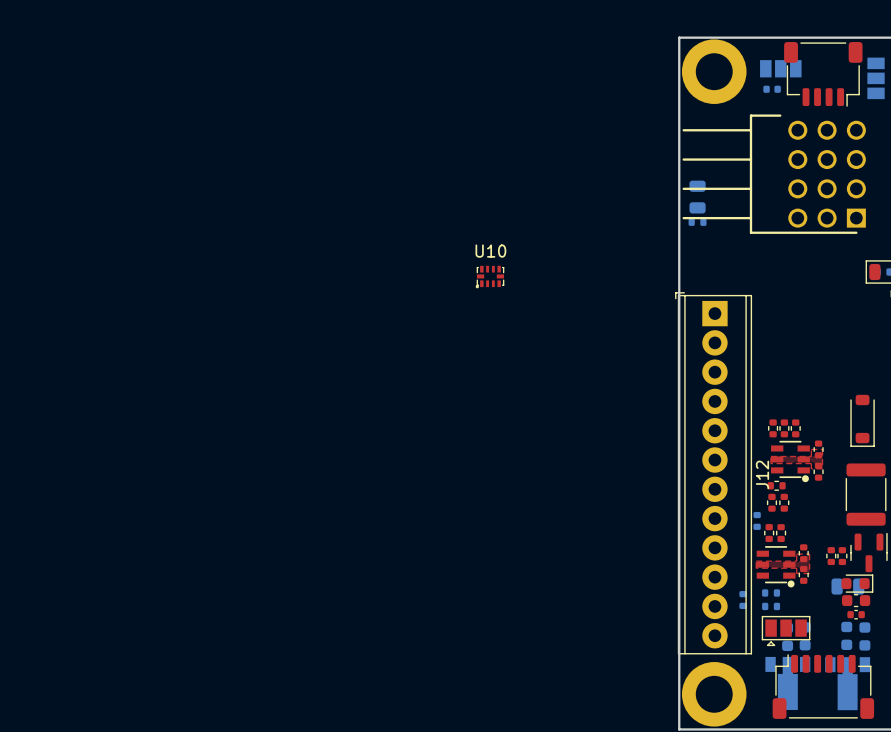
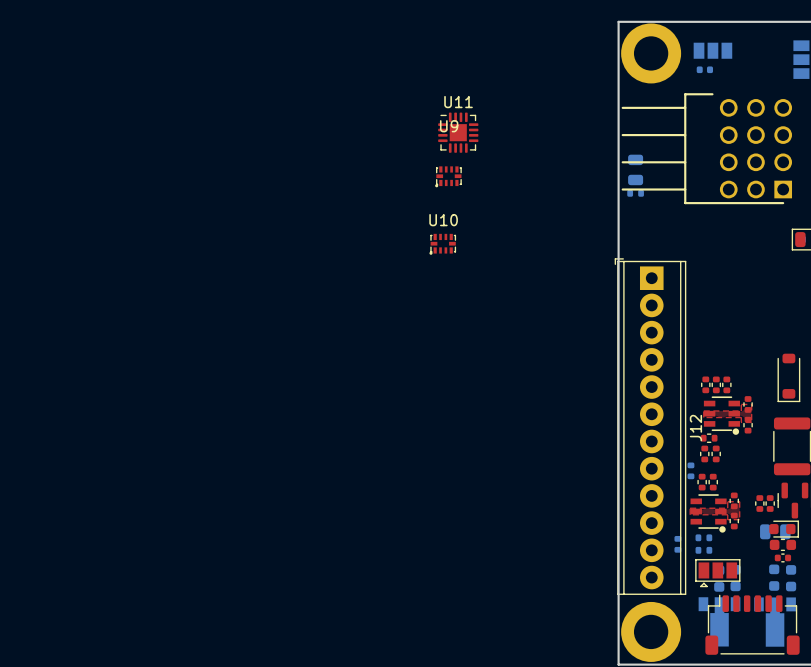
part: (823, 74) -> none
U11: none -> (458, 132)
U9: none -> (448, 176)

